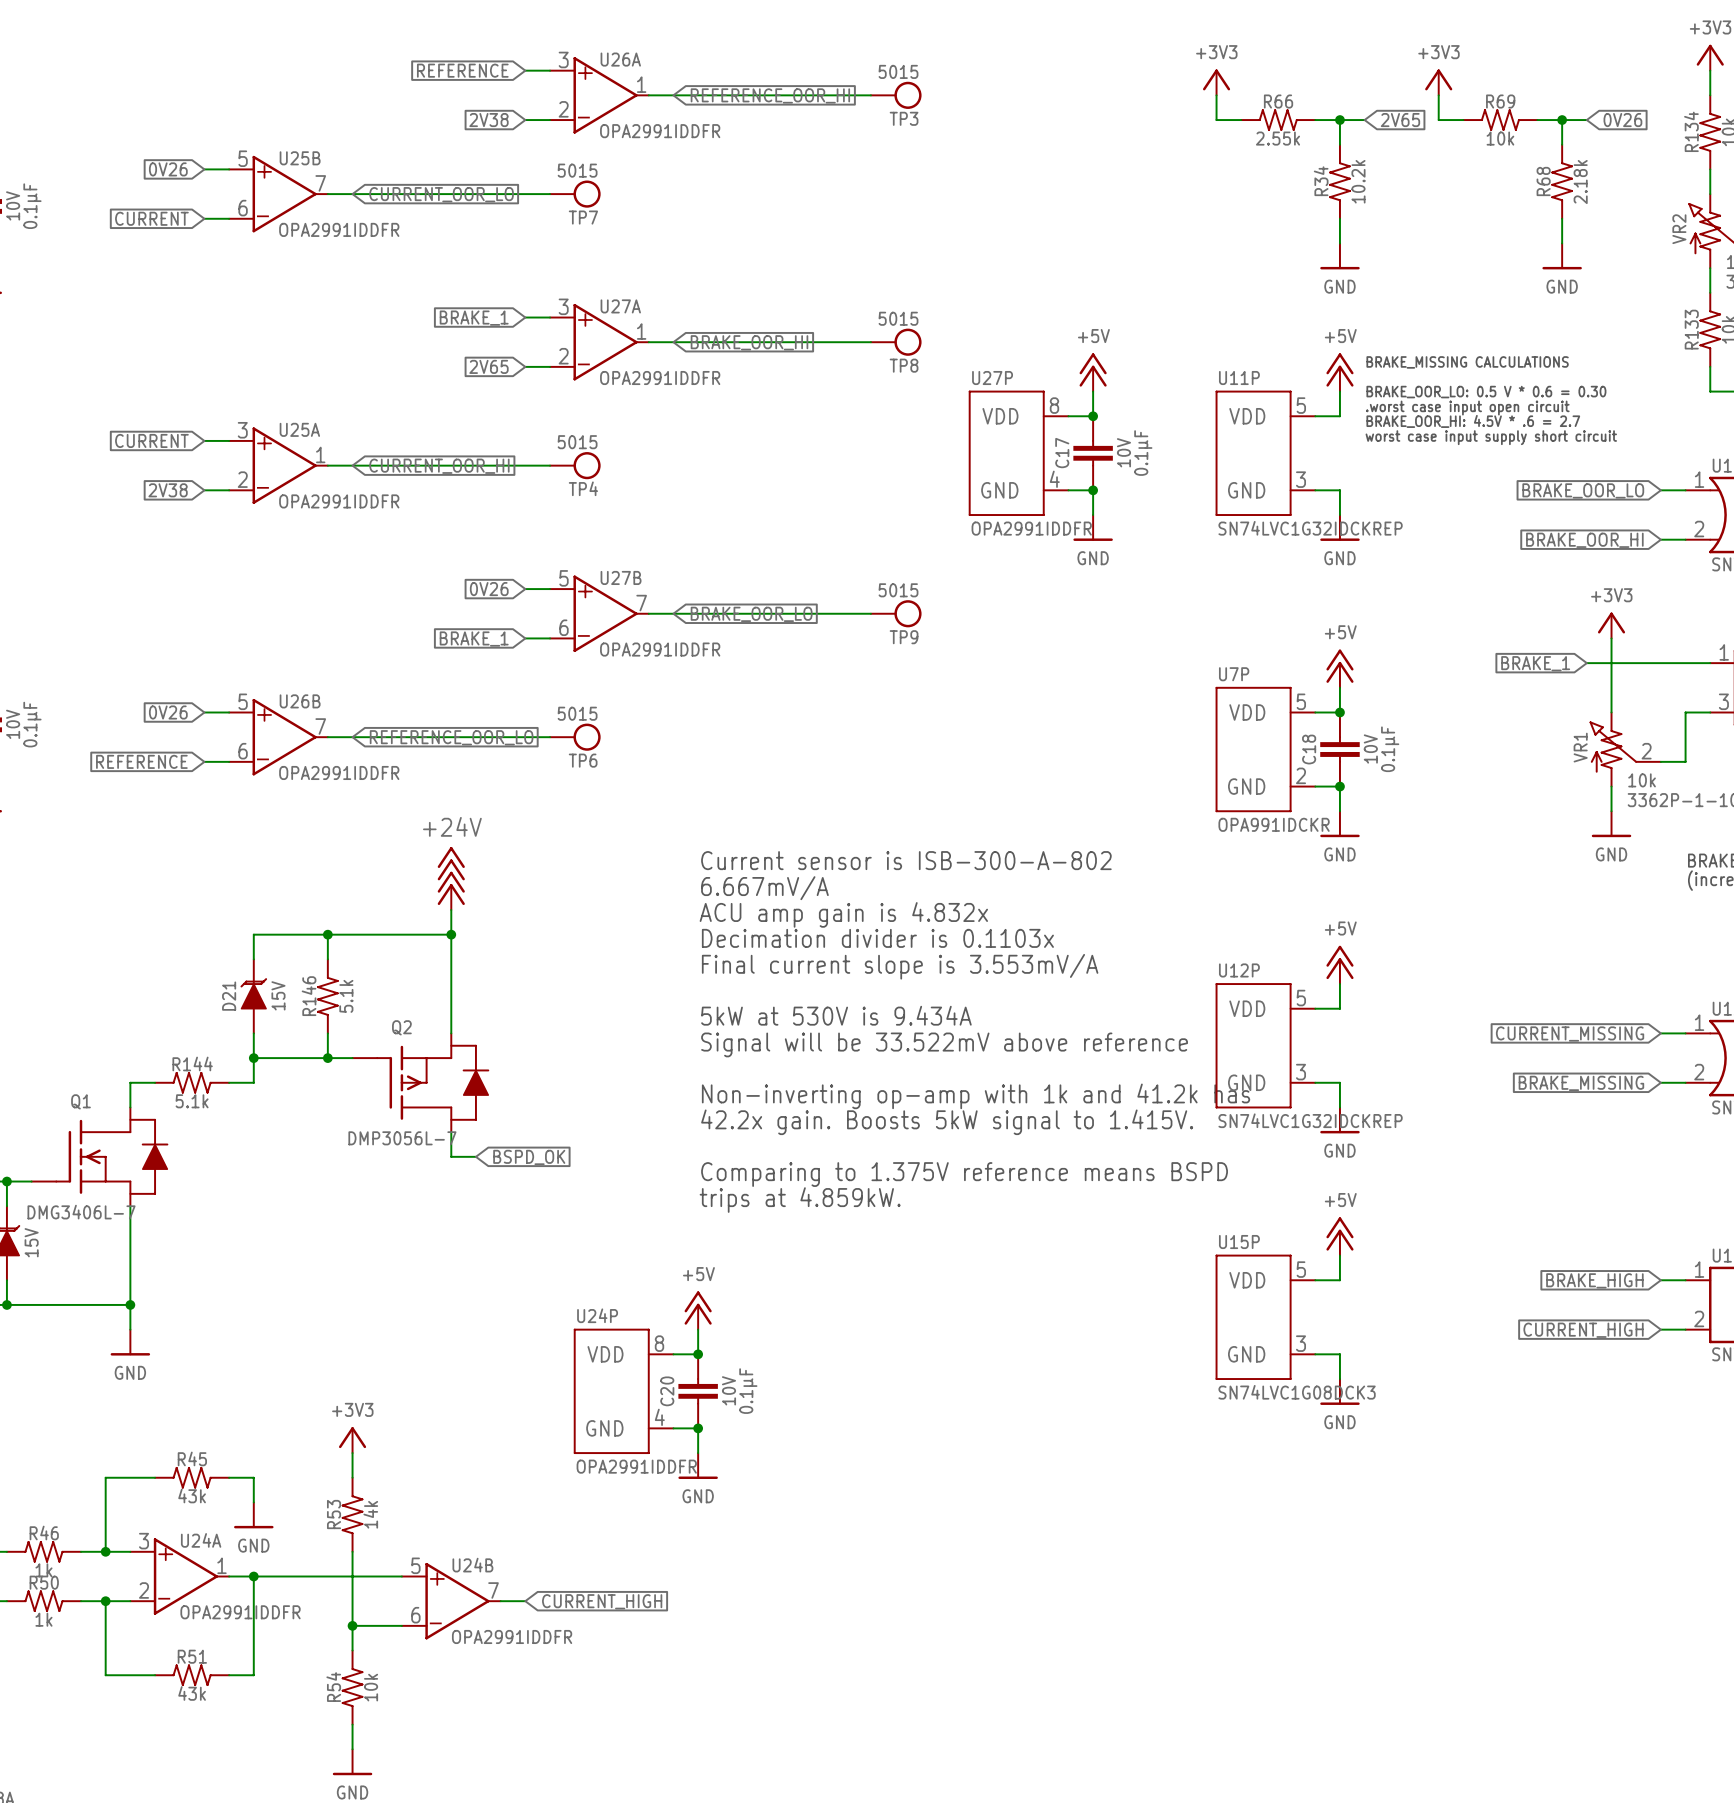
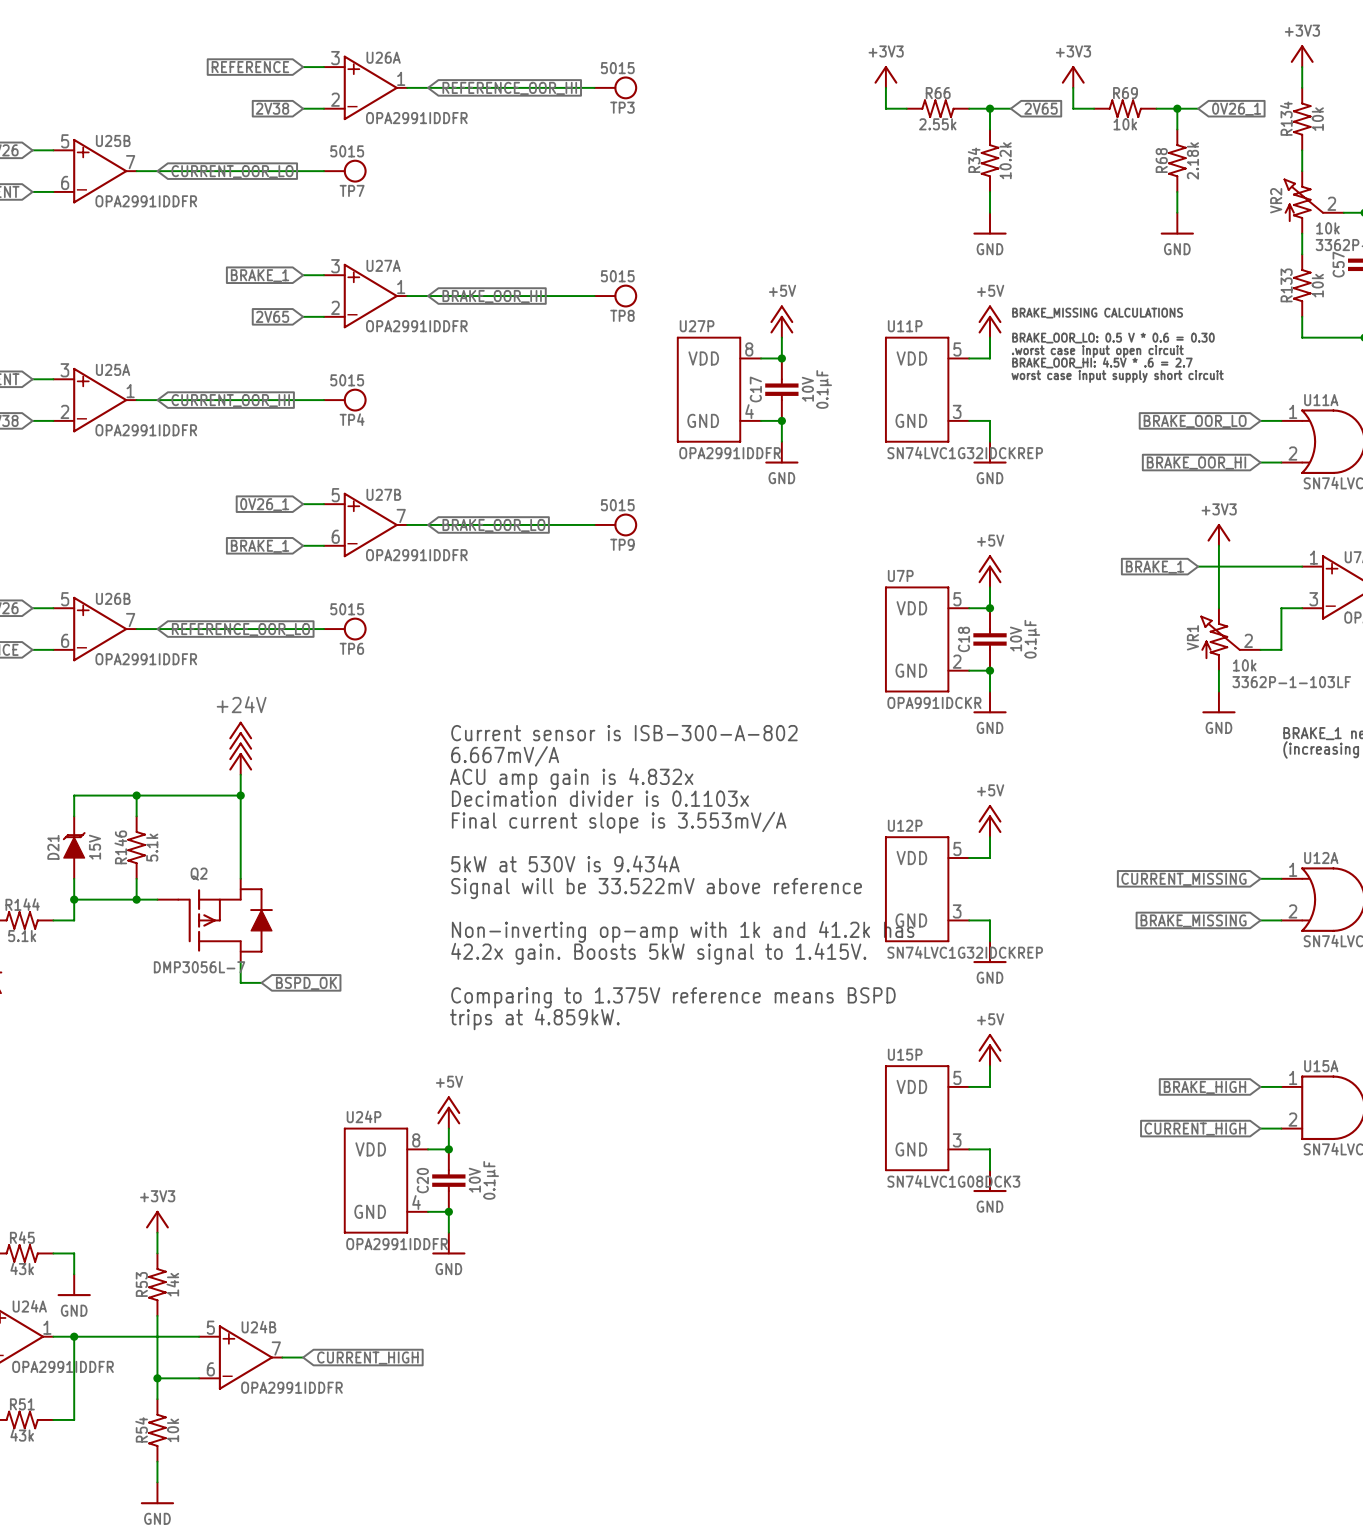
global label: 0V26 (1622, 120) -> 0V26_1 (1236, 109)
global label: 0V26 (489, 589) -> 0V26_1 (264, 504)

